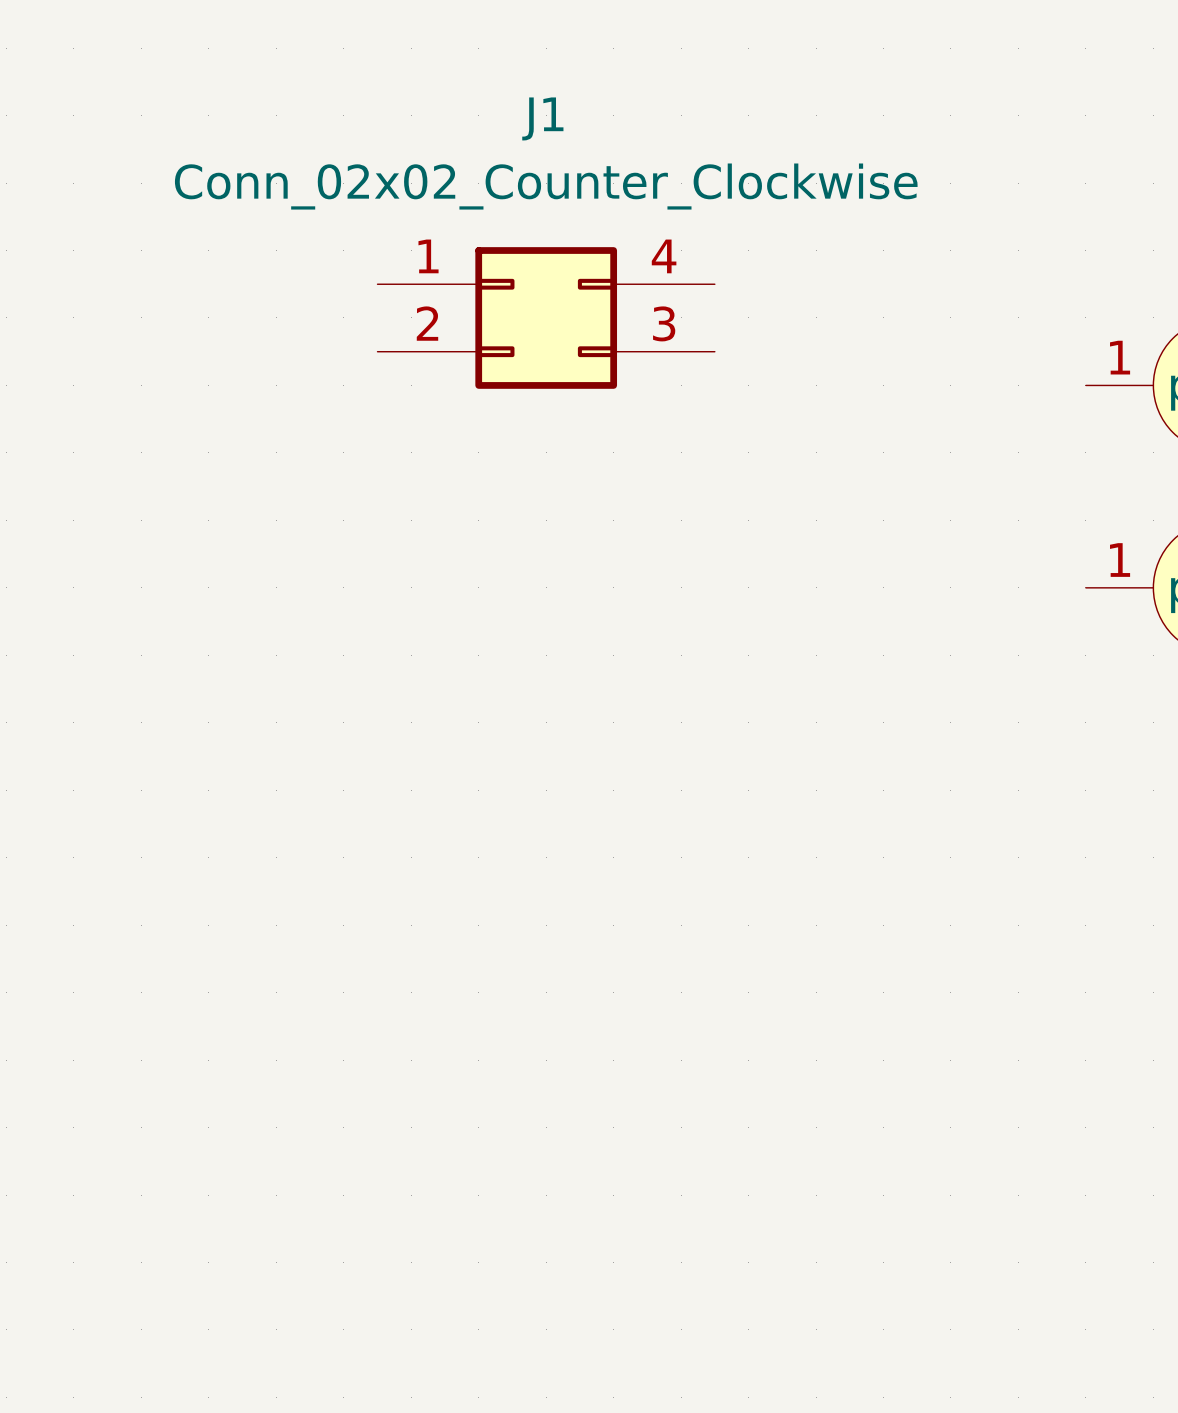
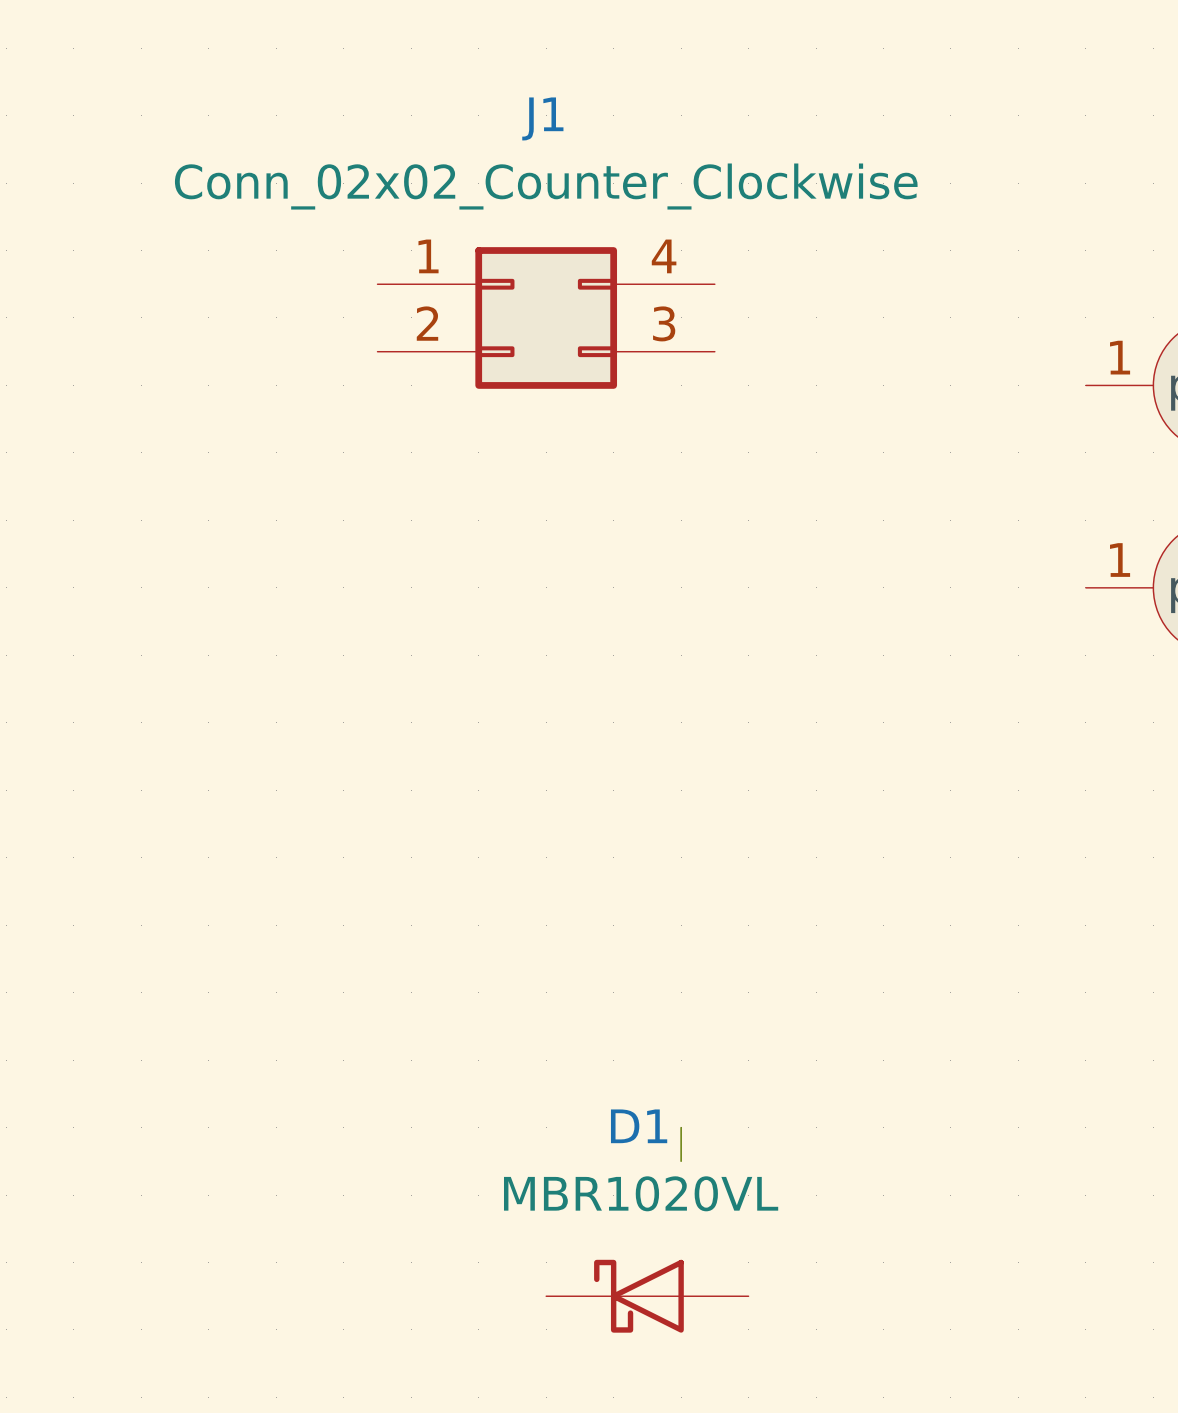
wire: none -> (681, 1127) (681, 1161)
D1: none -> MBR1020VL (647, 1296)

